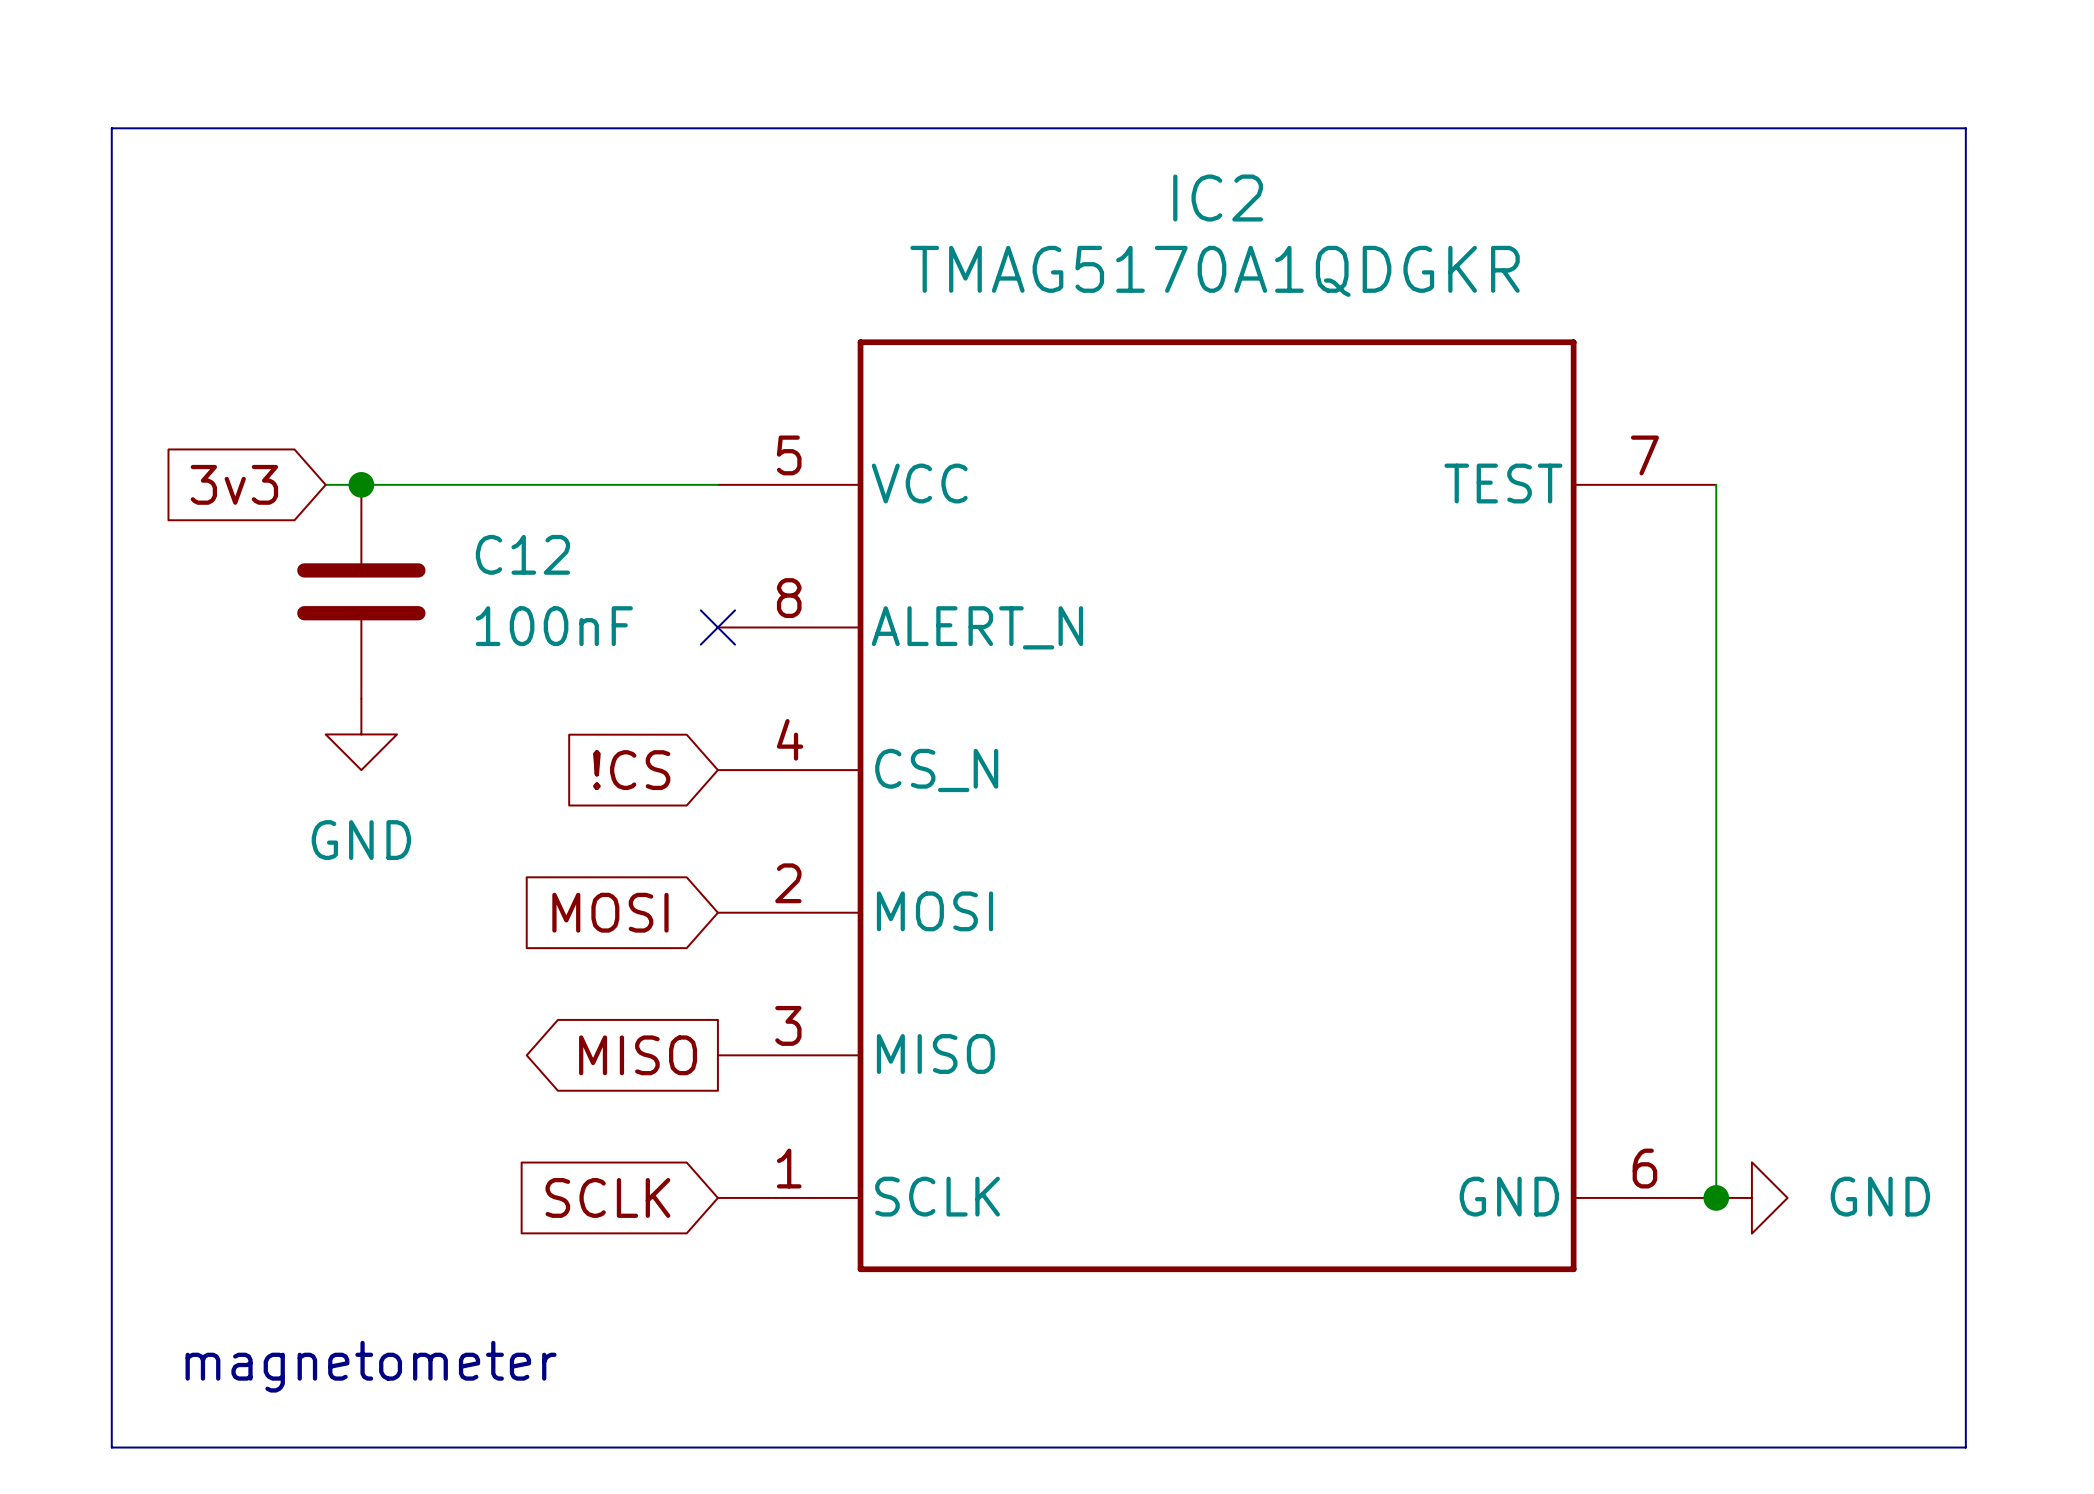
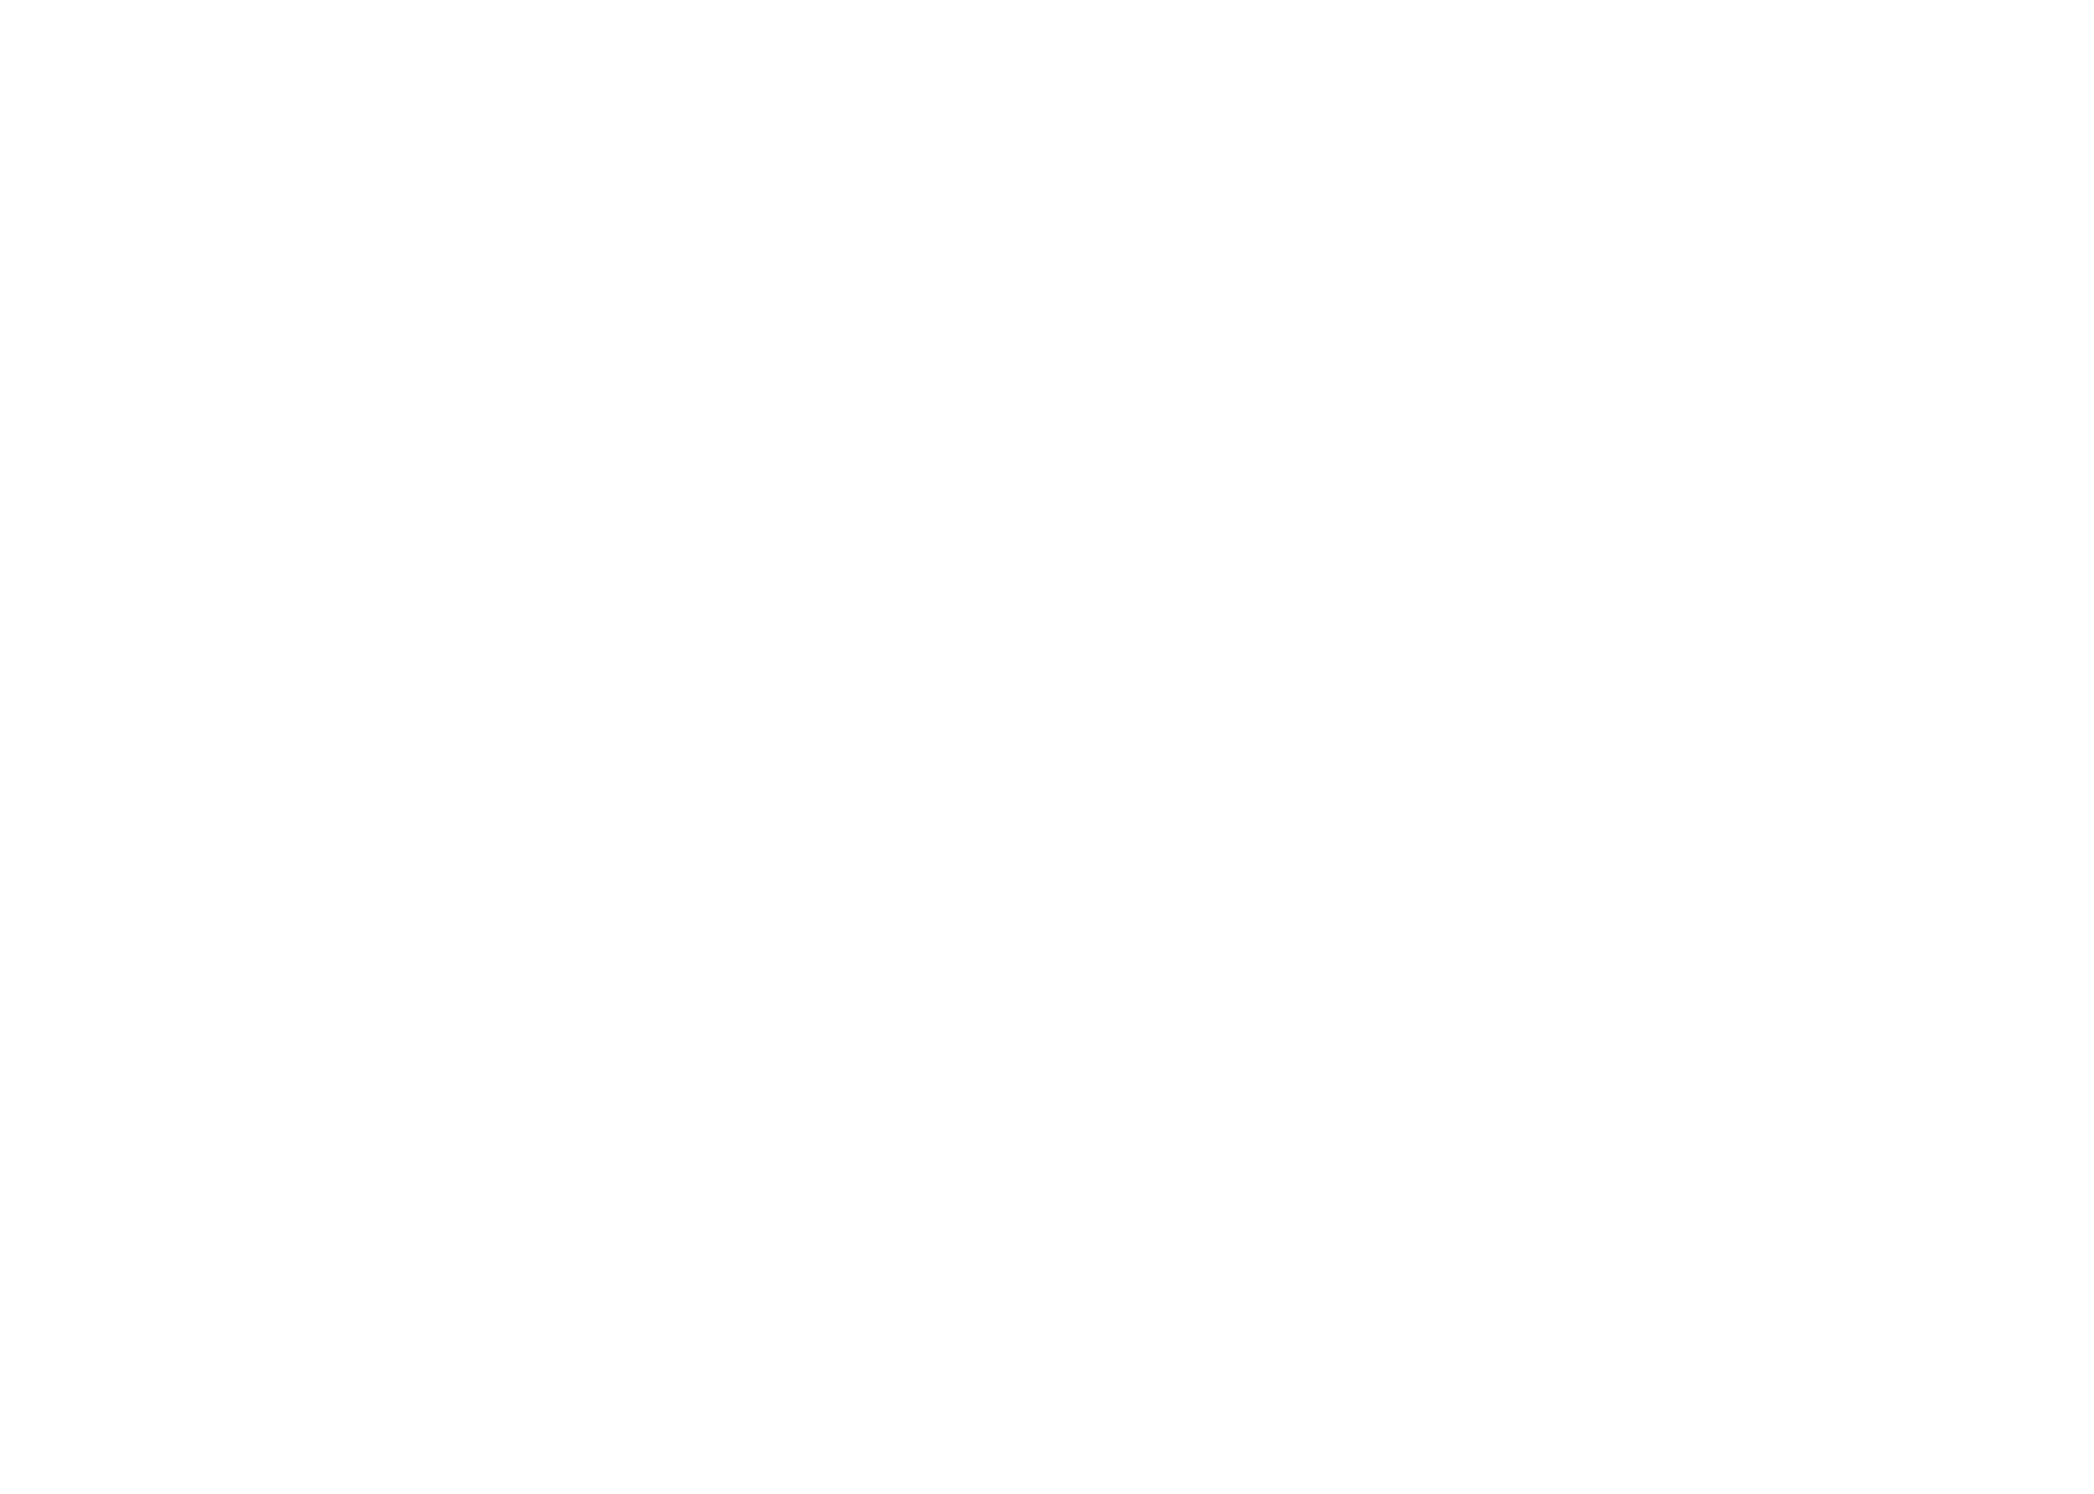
line: (111, 128) (1965, 128) (1965, 1447) (111, 1447) (111, 128) -> none
global label: 3v3 (234, 484) -> none
wire: (325, 484) (717, 484) -> none
junction: (361, 484) -> none
wire: (1716, 484) (1716, 1197) -> none
C12: 100nF (361, 591) -> none
no-connect mark: (717, 627) -> none
power symbol: GND (361, 734) -> none
global label: !CS (631, 770) -> none
IC2: TMAG5170A1QDGKR (1217, 805) -> none
global label: MOSI (610, 912) -> none
global label: MISO (638, 1055) -> none
global label: SCLK (607, 1197) -> none
junction: (1716, 1197) -> none
power symbol: GND (1751, 1197) -> none
text: magnetometer (371, 1366) -> none

